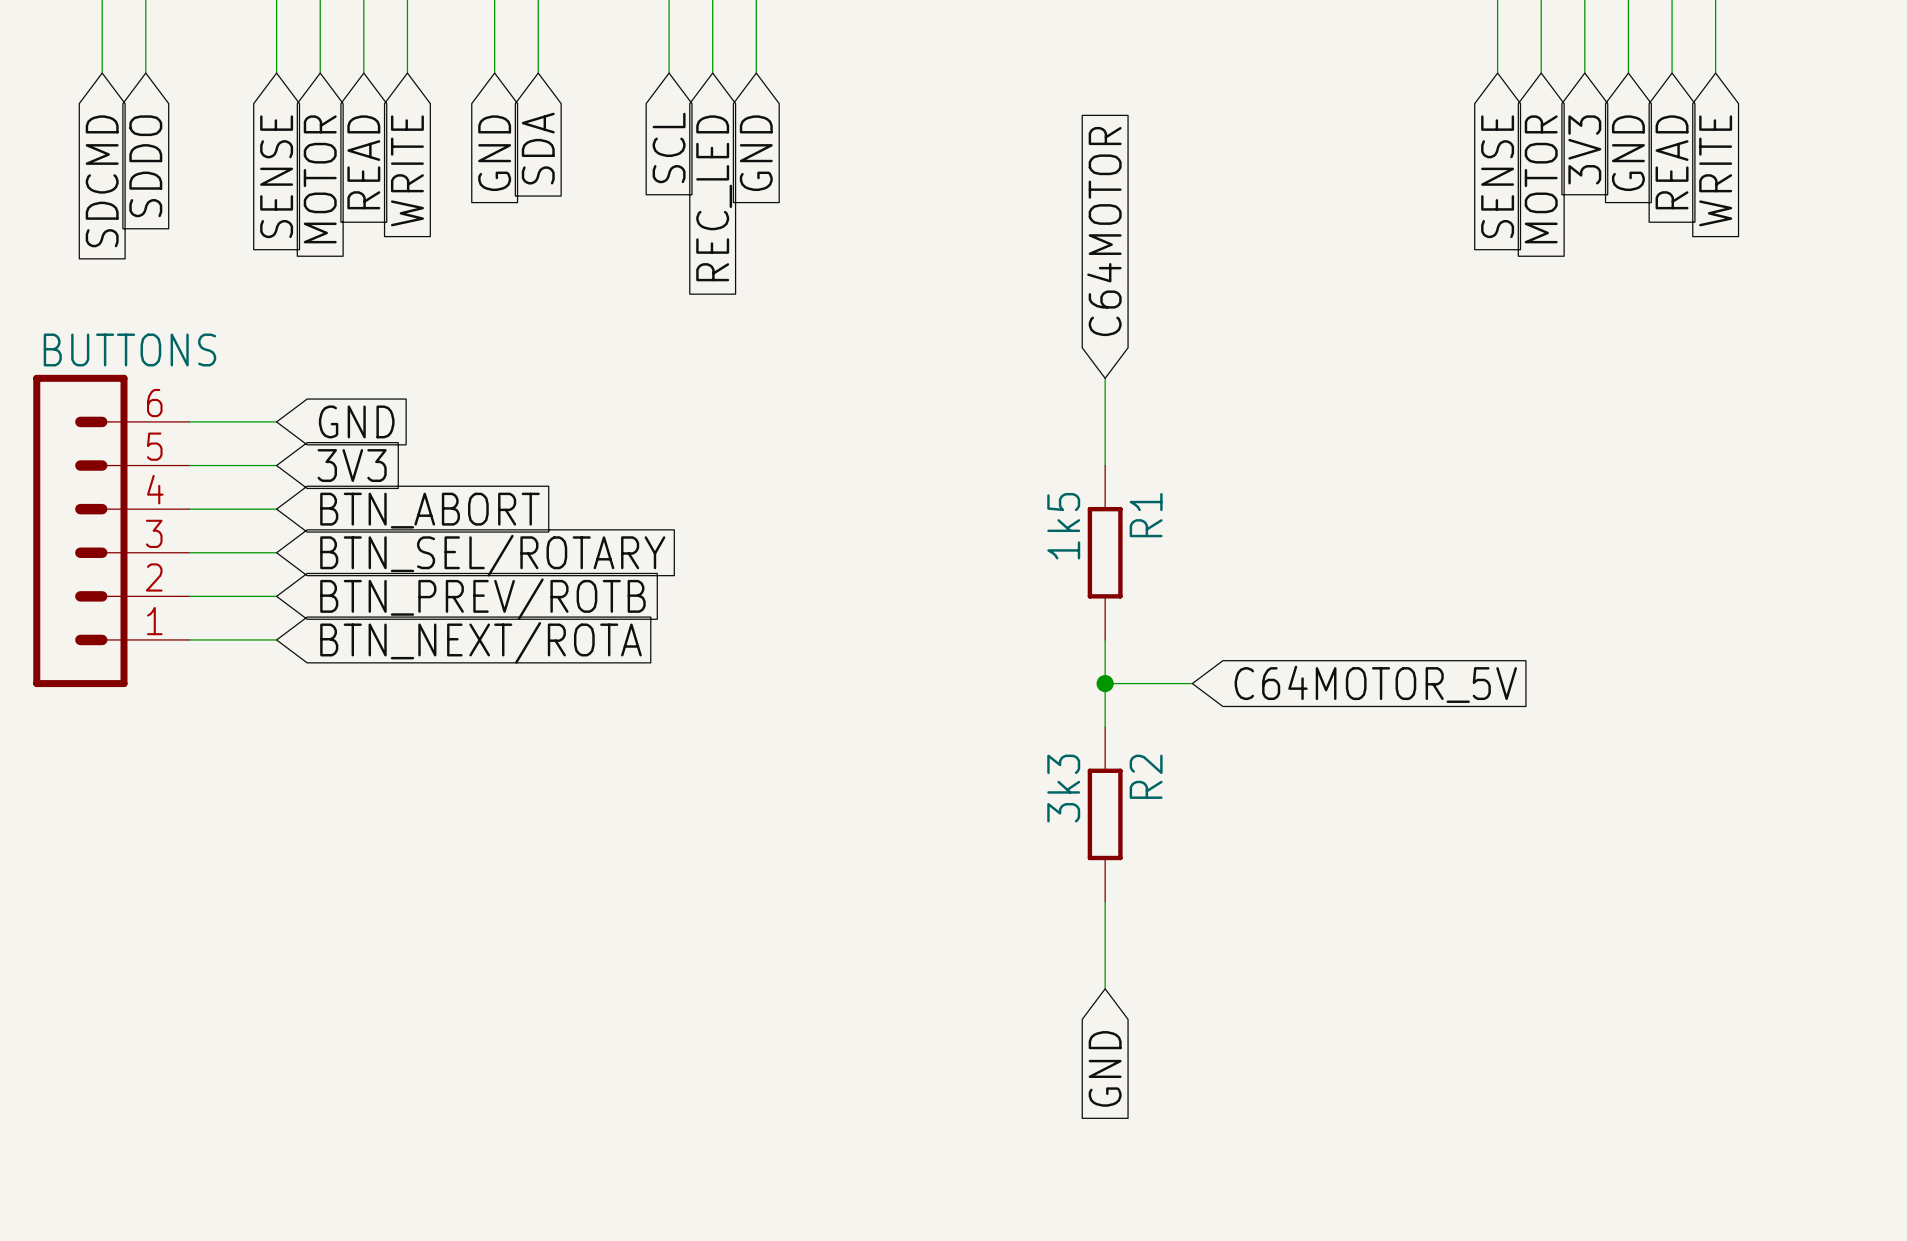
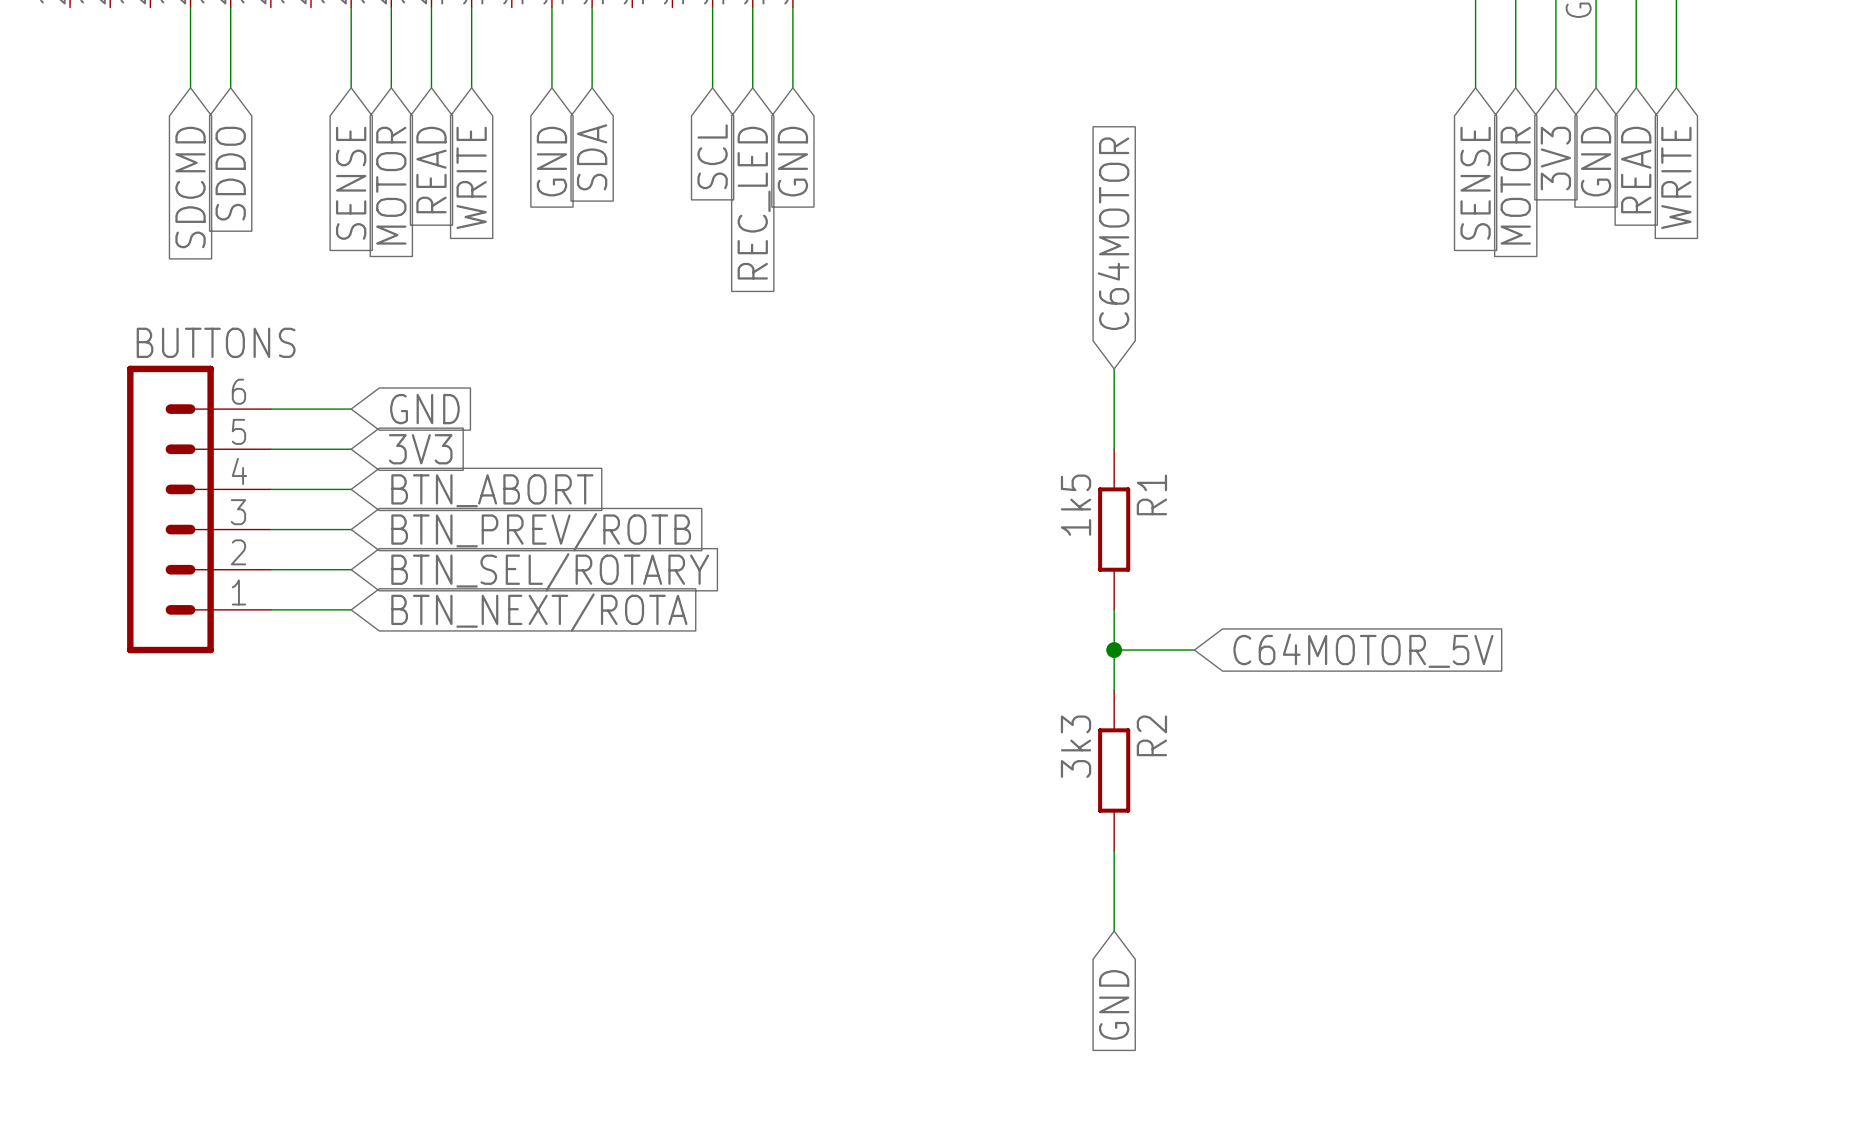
global label: BTN_SEL/ROTARY (492, 555) -> BTN_PREV/ROTB (541, 532)
global label: BTN_PREV/ROTB (482, 599) -> BTN_SEL/ROTARY (550, 572)

